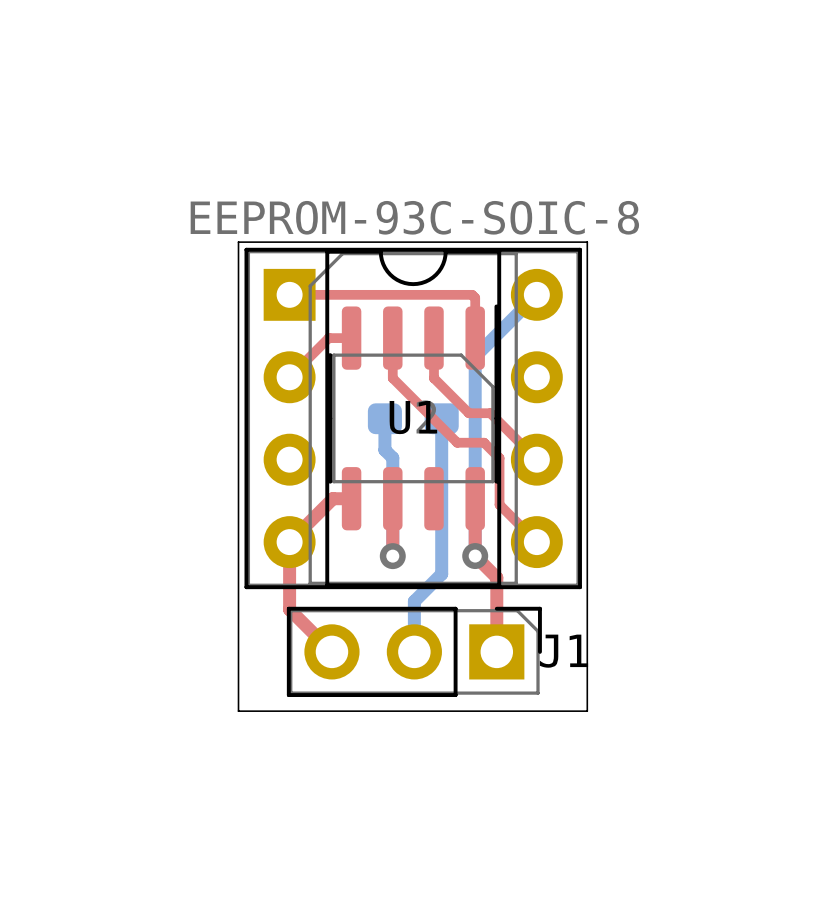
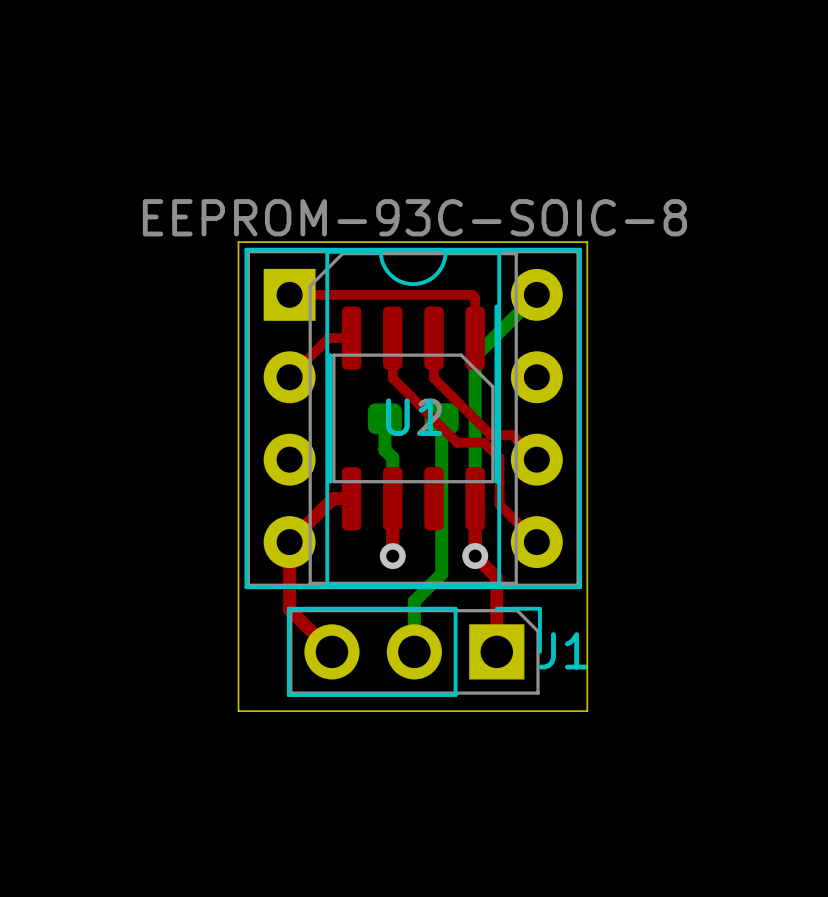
top track: (468, 413) (490, 413) (512, 435) -> (468, 413) (490, 435) (512, 435)

